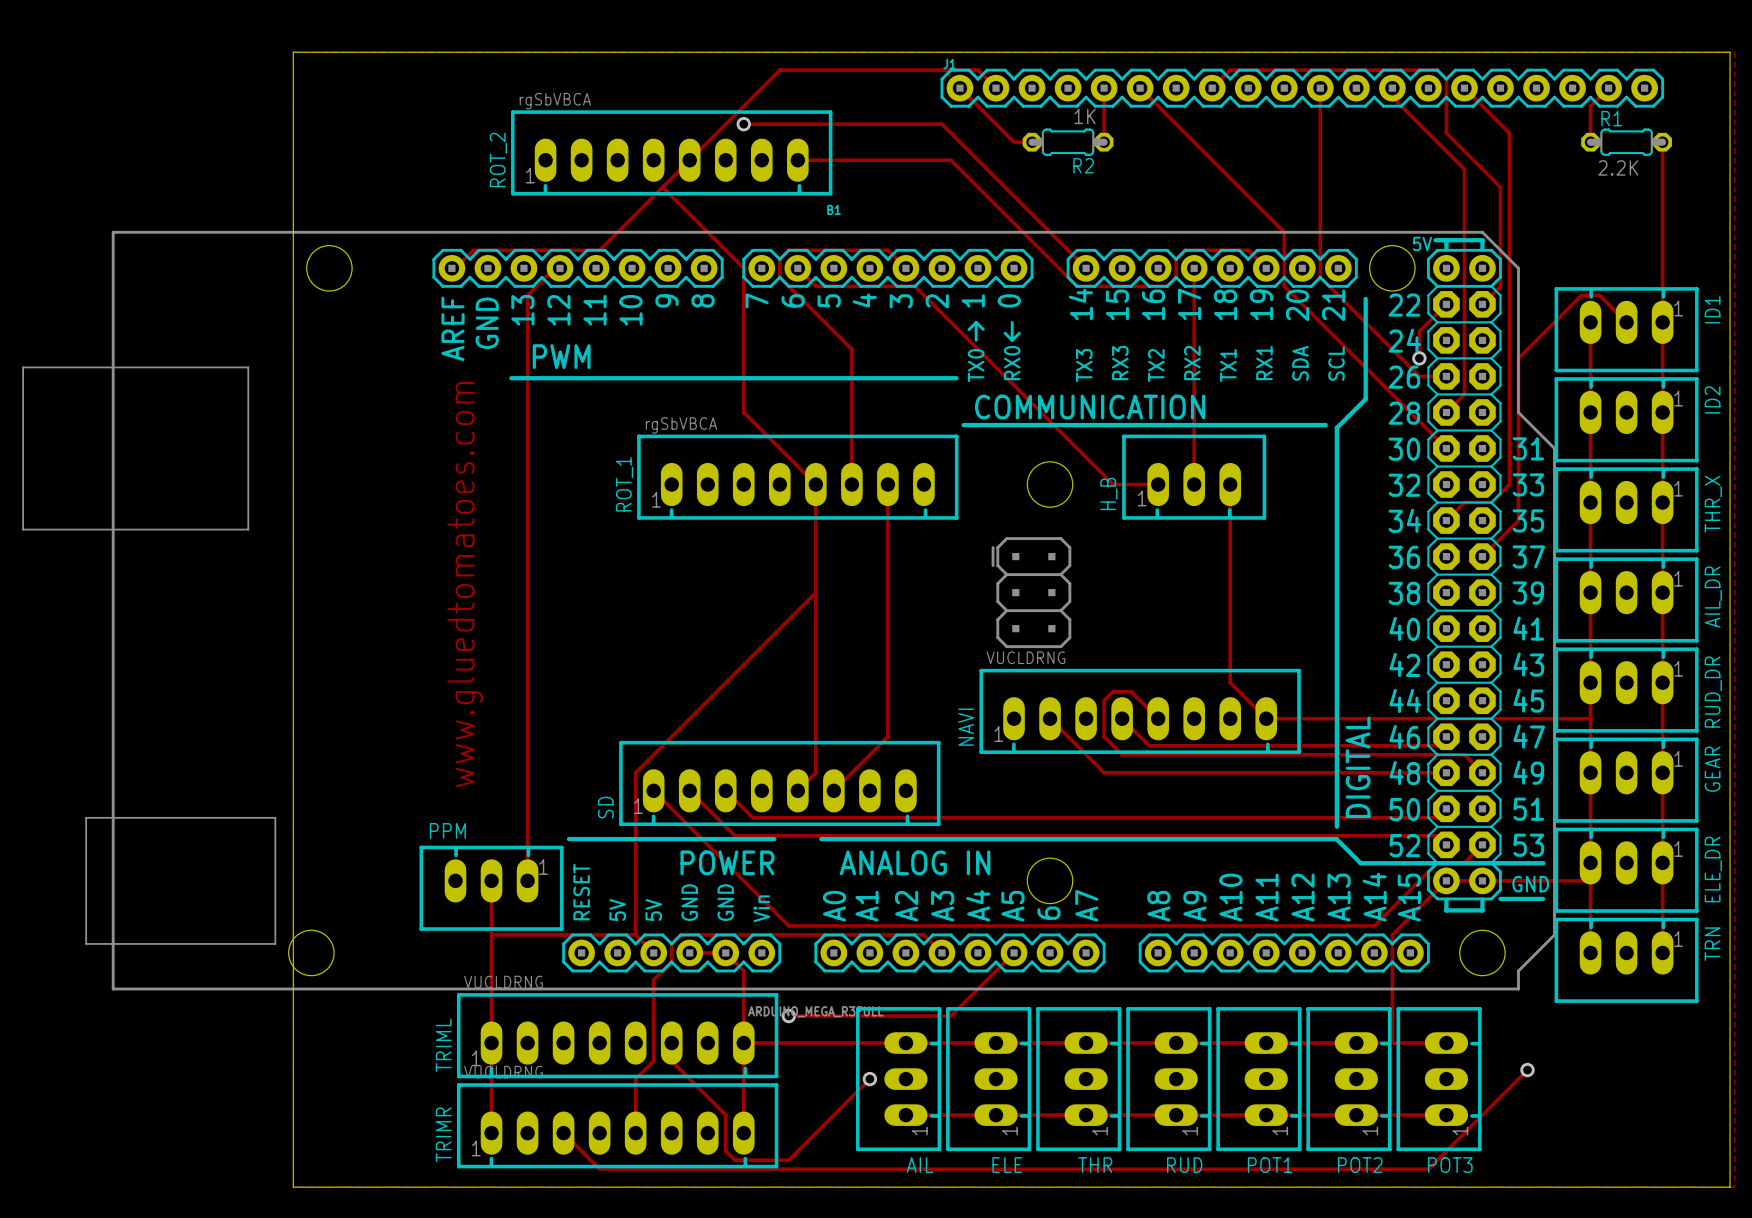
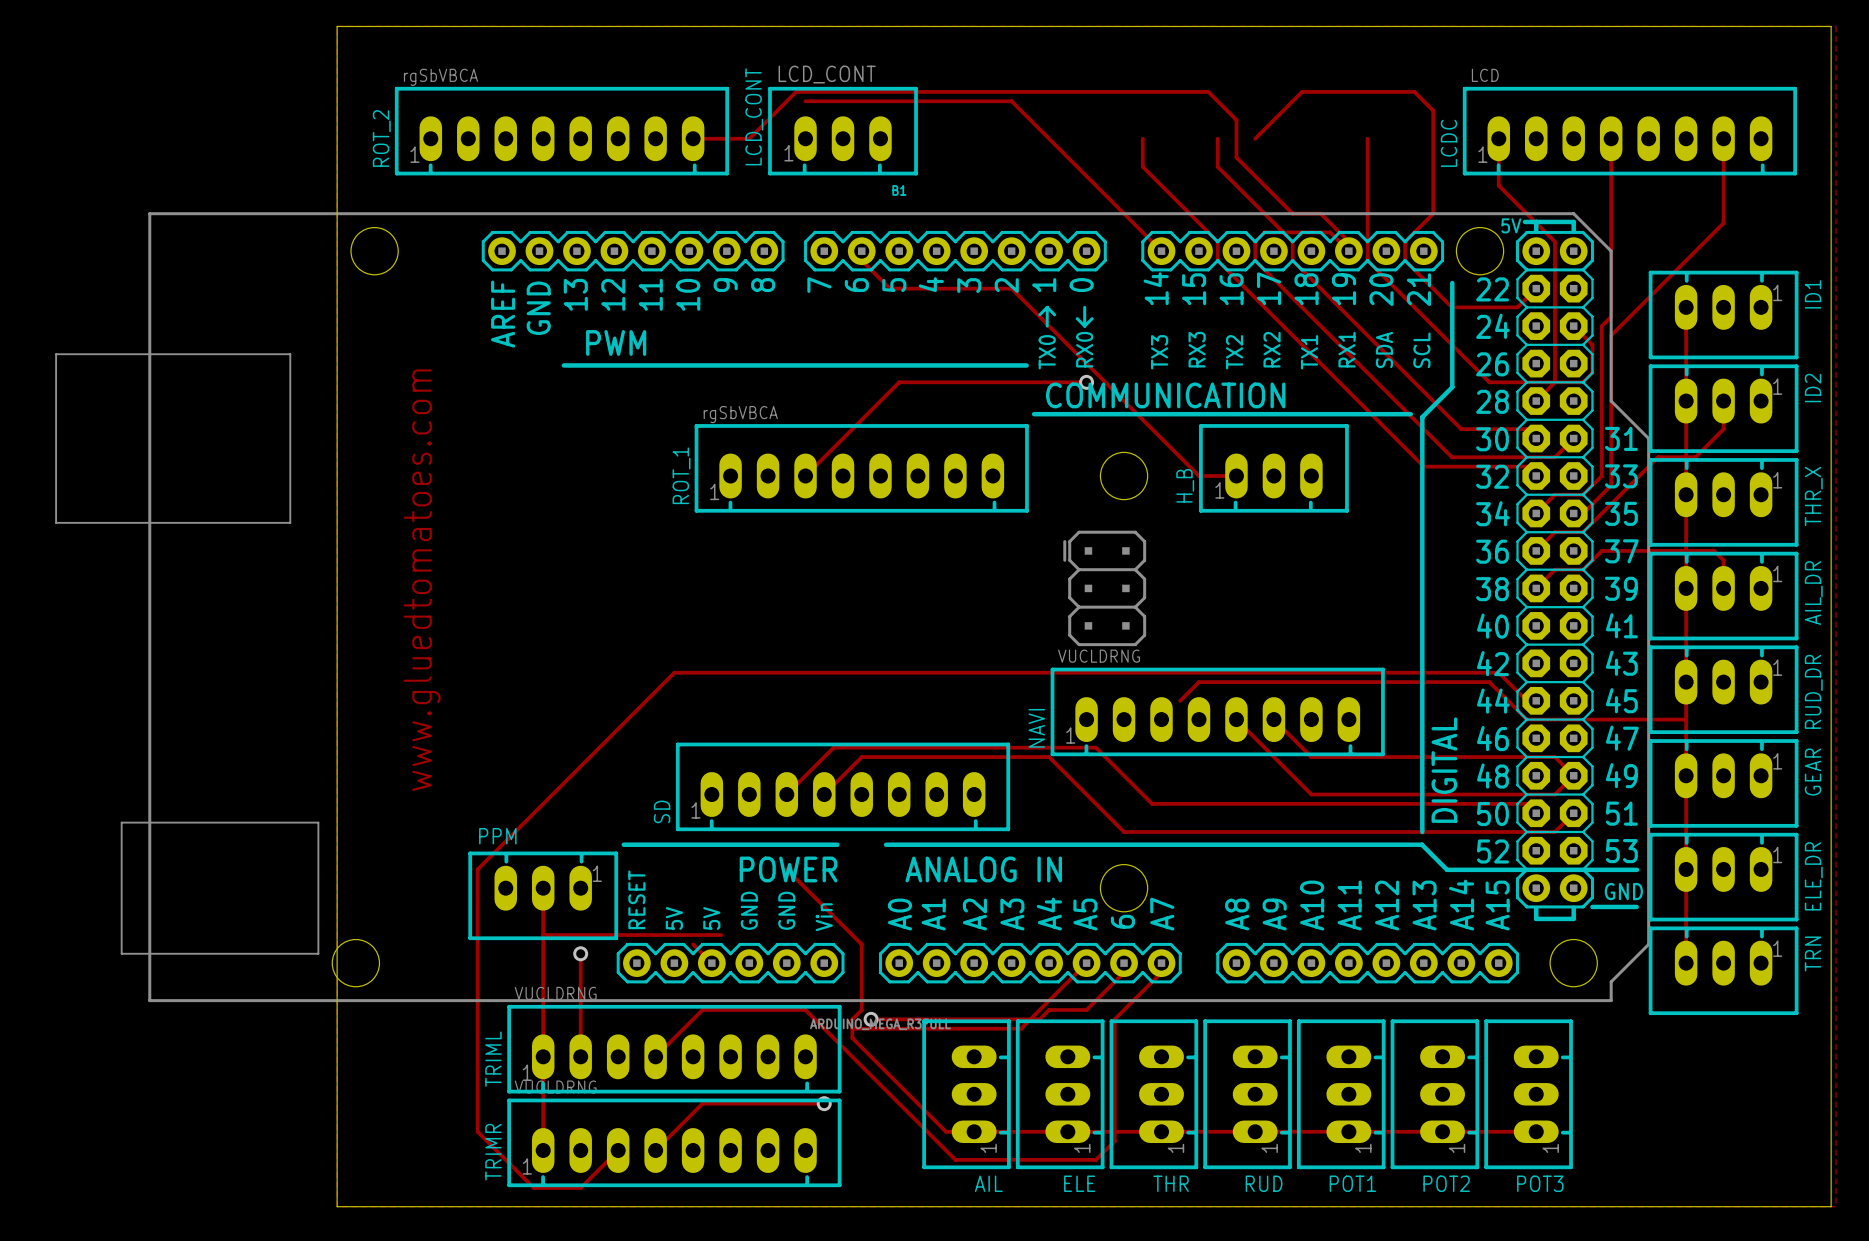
track: (959, 88) (1014, 142) (1032, 142) -> none
track: (996, 88) (977, 70) (779, 70) (734, 115) -> (1348, 251) (1348, 241) (1320, 213) (1292, 213) (1236, 157) (1236, 120) (1208, 91) (796, 91)
track: (1104, 88) (1104, 142) -> none
track: (1140, 88) (1284, 232) -> (1367, 138) (1367, 213)
track: (1212, 88) (1230, 70) (1437, 70) (1446, 79) (1446, 133) (1500, 187) (1500, 286) (1482, 304) -> none
J1: (1302, 88) -> none
track: (1320, 88) (1320, 259) -> (1255, 138) (1302, 91) (1414, 91) (1433, 110) (1433, 213) (1405, 241)
track: (1392, 88) (1392, 97) (1464, 169) (1464, 259) -> (1498, 138) (1498, 185) (1554, 241)
track: (1464, 88) (1509, 133) (1509, 340) -> (1611, 138) (1611, 316) (1601, 326)
track: (1608, 88) (1590, 106) (1590, 142) -> none
via: (743, 124) -> none
R2: 1K (1068, 142) -> none
R1: 2.2K (1626, 142) -> none
track: (1662, 142) (1662, 952) -> none
ROT_2 position: (671, 152) -> (561, 131)
LCD_CONT: none -> LCD_CONT (843, 131)
LCDC: none -> LCD (1629, 131)
track: (689, 160) (599, 250) (473, 250) (455, 268) (451, 268) -> (749, 138) (693, 138)
track: (797, 160) (950, 160) (1077, 286) (1167, 286) (1176, 277) -> (1573, 438) (1554, 457) (1451, 457) (1255, 260)
track: none -> (1142, 138) (1142, 166) (1217, 241) (1217, 260) (1423, 466) (1526, 466) (1536, 476)
track: none -> (1217, 138) (1217, 166) (1292, 241) (1292, 260) (1461, 429) (1526, 429)
track: (662, 187) (743, 268) (743, 412) (815, 484) (815, 772) (797, 790) -> none
track: (560, 268) (554, 268) (527, 295) (527, 880) -> none
track: (797, 268) (815, 286) (914, 286) (1113, 484) (1122, 484) -> (861, 251) (861, 260) (889, 288) (1011, 288) (1198, 476)
track: (905, 268) (887, 250) (788, 250) (779, 259) (779, 277) (851, 349) (851, 484) -> none
track: (1194, 268) (1194, 484) -> none
track: (1284, 277) (1284, 286) (1437, 439) -> (1367, 260) (1489, 382) (1583, 382) (1592, 372) (1592, 344) (1573, 326)
track: (1365, 322) (1419, 376) (1446, 376) -> (1451, 307) (1517, 307)
track: (1428, 322) (1419, 331) (1419, 358) -> none
track: (1626, 322) (1599, 295) (1581, 295) (1518, 358) -> (1723, 138) (1723, 223) (1611, 335) (1611, 344)
via: (1419, 358) -> none
track: none -> (1086, 382) (899, 382) (805, 476)
via: none -> (1086, 382)
track: none -> (1723, 401) (1723, 429) (1695, 457) (1658, 457) (1583, 532) (1554, 532) (1536, 550)
track: (887, 484) (887, 736) (833, 790) -> none
track: (1230, 484) (1230, 682) (1266, 718) (1437, 718) -> (1189, 691) (1198, 682) (1489, 682) (1526, 719)
track: (1518, 493) (1518, 520) (1482, 556) -> (1611, 485) (1583, 513) (1573, 513)
text position: www.gluedtomatoes.com (465, 584) -> www.gluedtomatoes.com (422, 580)
track: (815, 592) (635, 772) (635, 934) (491, 934) -> none
track: none -> (1536, 588) (1554, 569) (1583, 569) (1601, 550) (1714, 550) (1723, 560) (1723, 588)
track: (1113, 691) (1131, 691) (1158, 718) -> (1573, 775) (1554, 794) (1311, 794) (1236, 719)
track: (1104, 700) (1104, 736) (1122, 754) (1230, 754) -> (1273, 719) (1311, 757)
track: (1050, 718) (1104, 772) (1446, 772) -> none
track: (1122, 718) (1149, 745) (1437, 745) (1446, 736) -> none
track: (653, 790) (725, 862) -> none
track: (689, 790) (734, 835) (1437, 835) (1446, 844) -> none
track: (725, 790) (752, 817) (1437, 817) (1446, 808) -> (786, 794) (833, 747) (1095, 747) (1152, 803) (1526, 803) (1536, 813)
track: none -> (824, 794) (861, 757) (1049, 757) (1124, 831) (1554, 831) (1573, 813)
track: (1482, 844) (1464, 862) (1437, 862) (1374, 925) (788, 925) -> (974, 1131) (946, 1131) (852, 1038) (852, 1019) (861, 1009) (861, 944) (852, 935)
track: (1590, 880) (1446, 880) (1392, 934) (1392, 1043) -> none
track: none -> (543, 935) (721, 935)
track: none -> (580, 953) (580, 1056)
via: none -> (580, 953)
track: (689, 952) (725, 952) (743, 970) (743, 1133) -> none
track: (941, 952) (923, 934) (680, 934) (671, 943) (671, 961) (653, 979) (653, 1061) (635, 1079) (635, 1133) -> none
track: none -> (1124, 963) (1124, 972) (1086, 1009) (1049, 1009) (1039, 1019) (871, 1019)
track: none -> (1161, 963) (1161, 972) (1114, 1019) (1114, 1141) (1095, 1159) (955, 1159) (805, 1009) (702, 1009) (655, 1056)
via position: (788, 1016) -> (871, 1019)
track: (671, 1043) (671, 1061) (725, 1115) (725, 1151) (734, 1160) (788, 1160) (869, 1079) -> none
track: (743, 1043) (1446, 1043) -> none
track: (1527, 1070) (1428, 1169) (599, 1169) (563, 1133) -> (1536, 700) (1526, 700) (1498, 672) (674, 672) (477, 869) (477, 1131) (533, 1187) (580, 1187) (618, 1150)
via: (1527, 1070) -> none
via: (869, 1079) -> none
track: none -> (824, 1103) (702, 1103) (655, 1150)
via: none -> (824, 1103)

